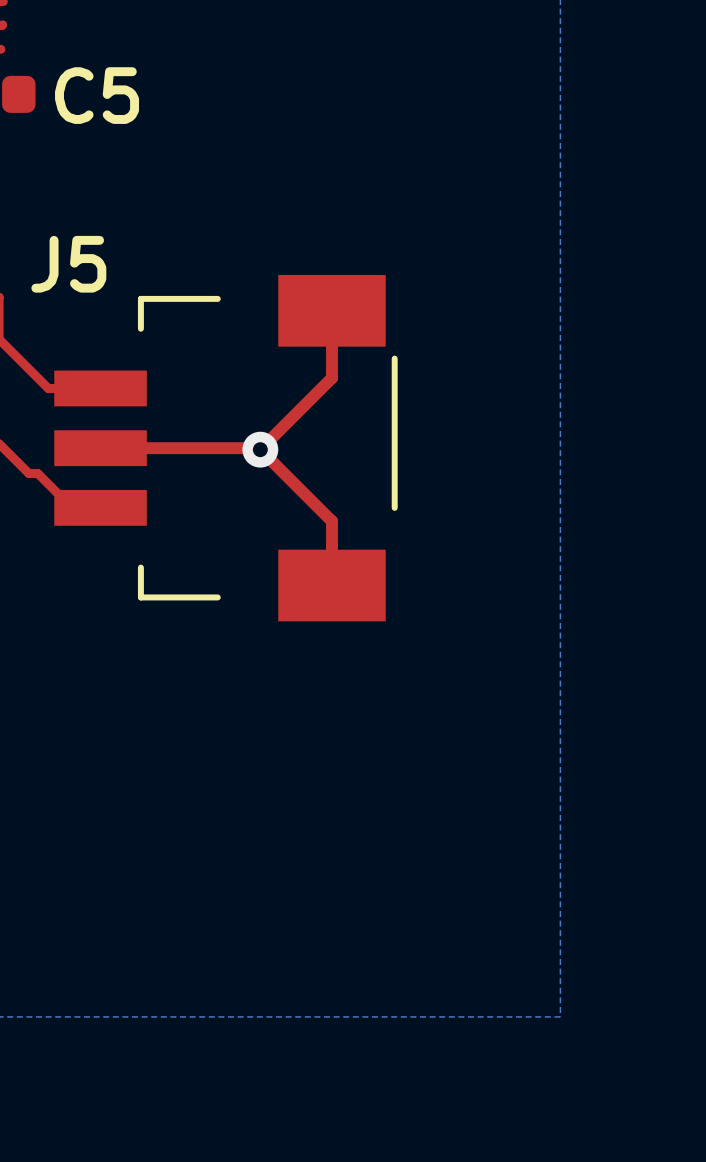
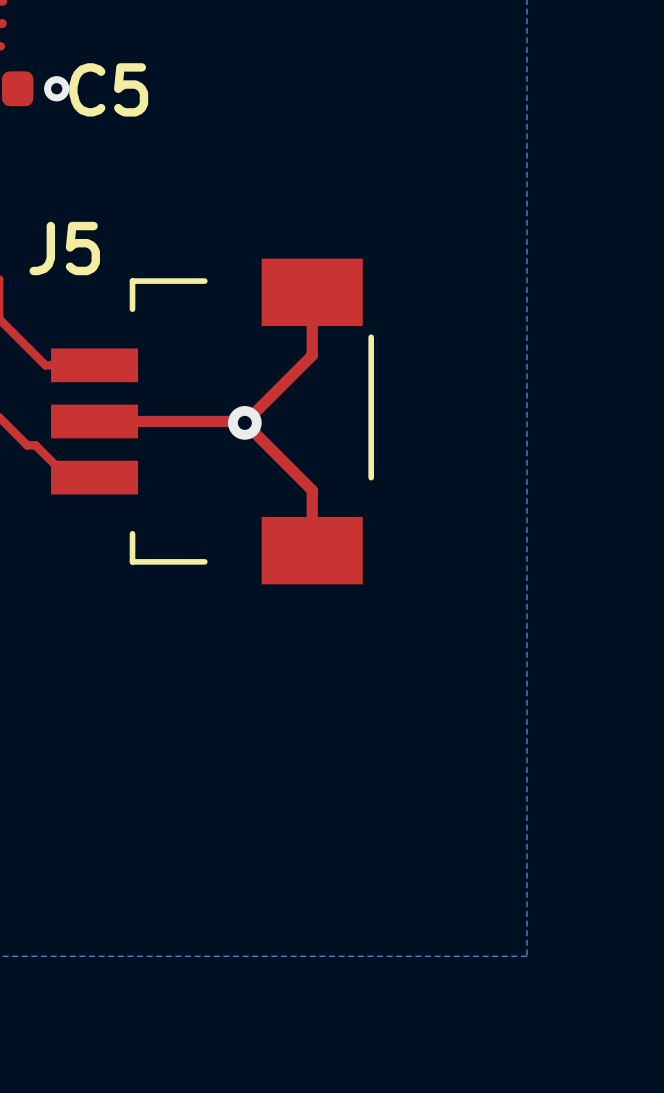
via: none -> (56, 88)
C5 name position: C5 (97, 95) -> C5 (108, 89)

